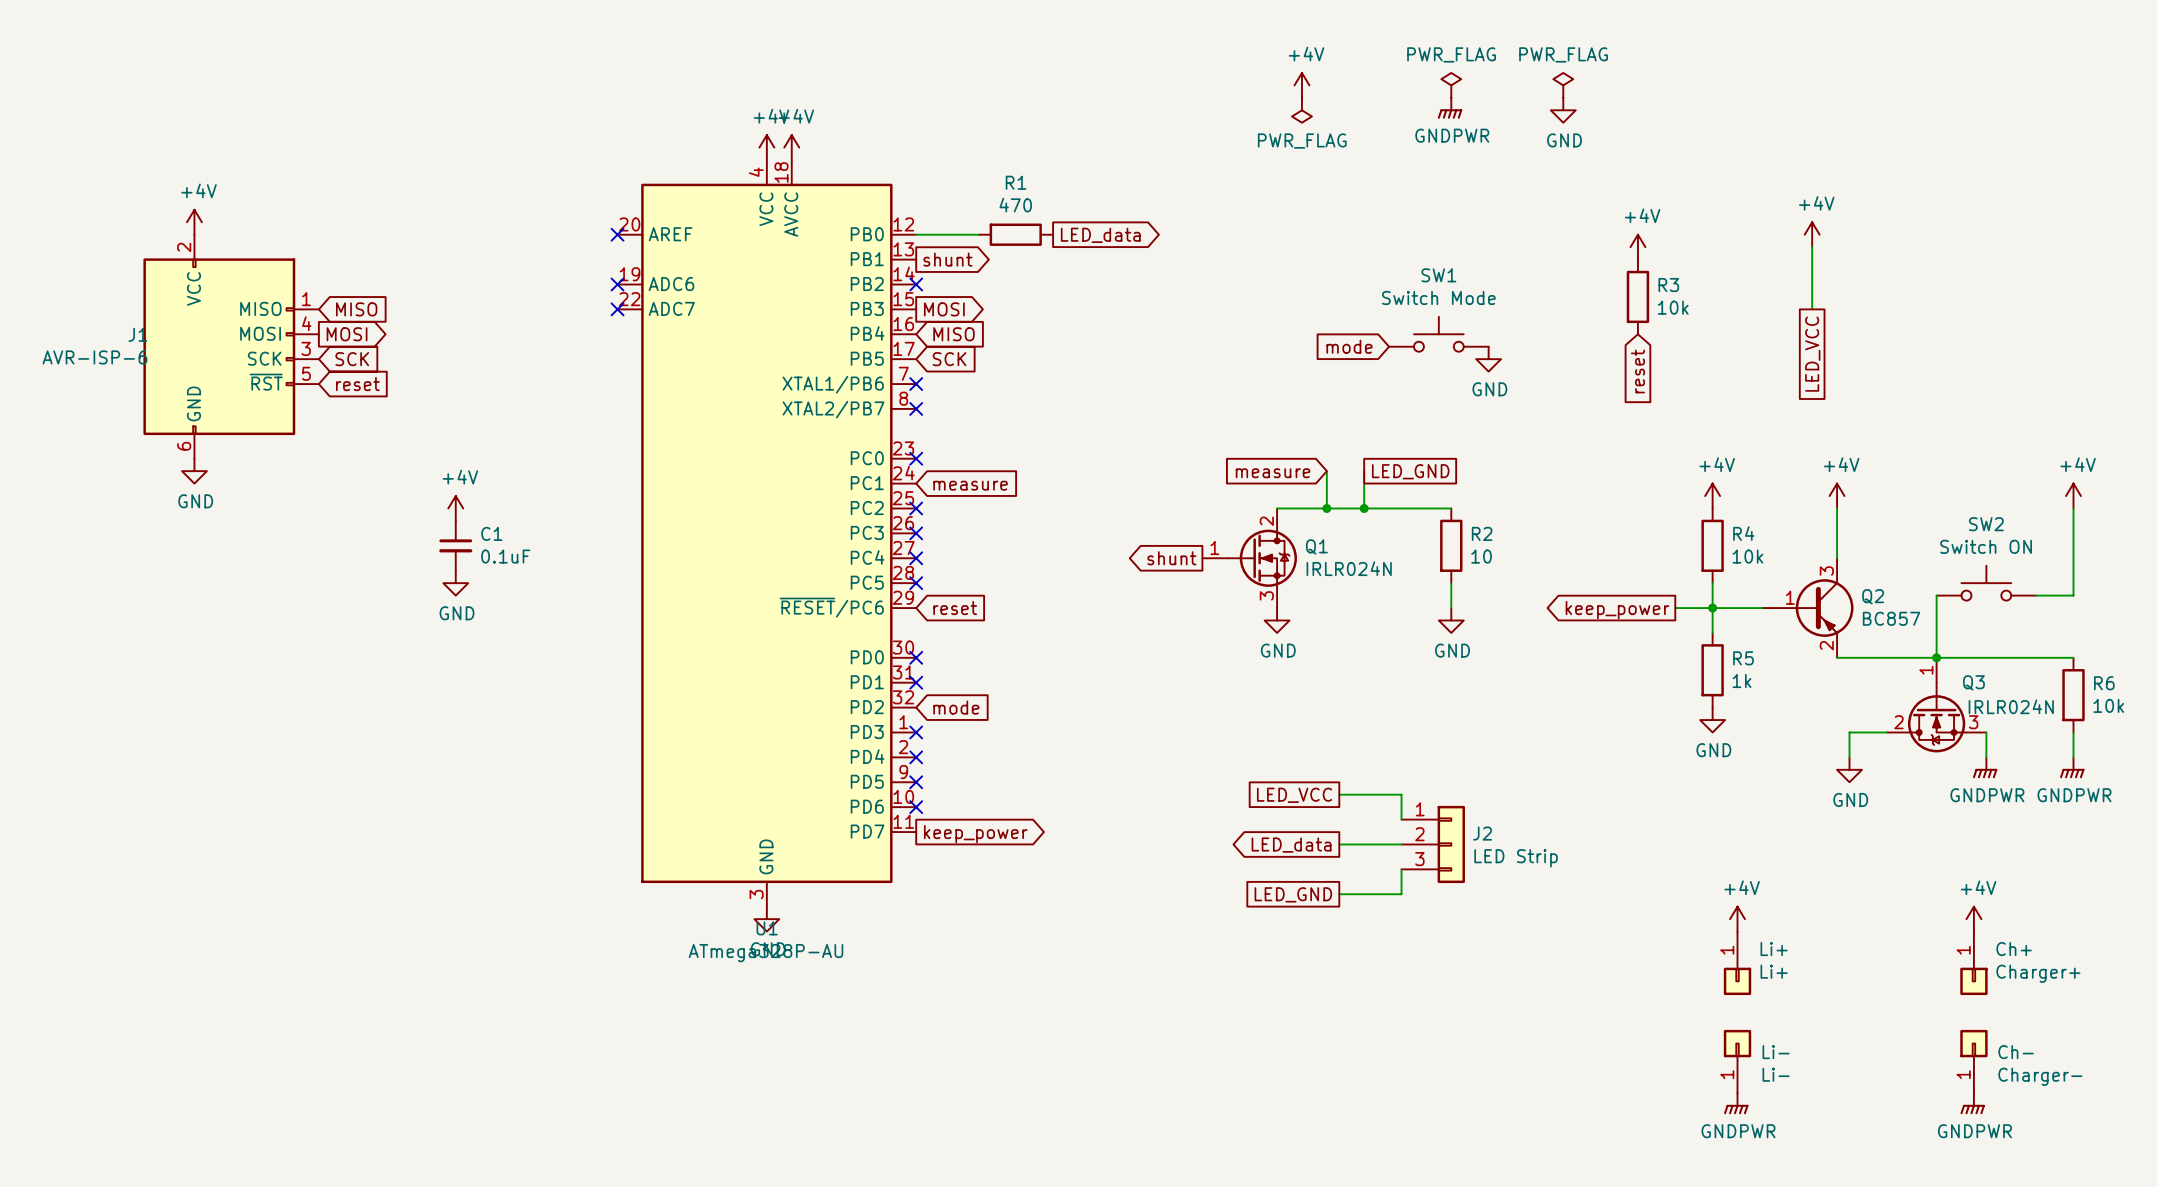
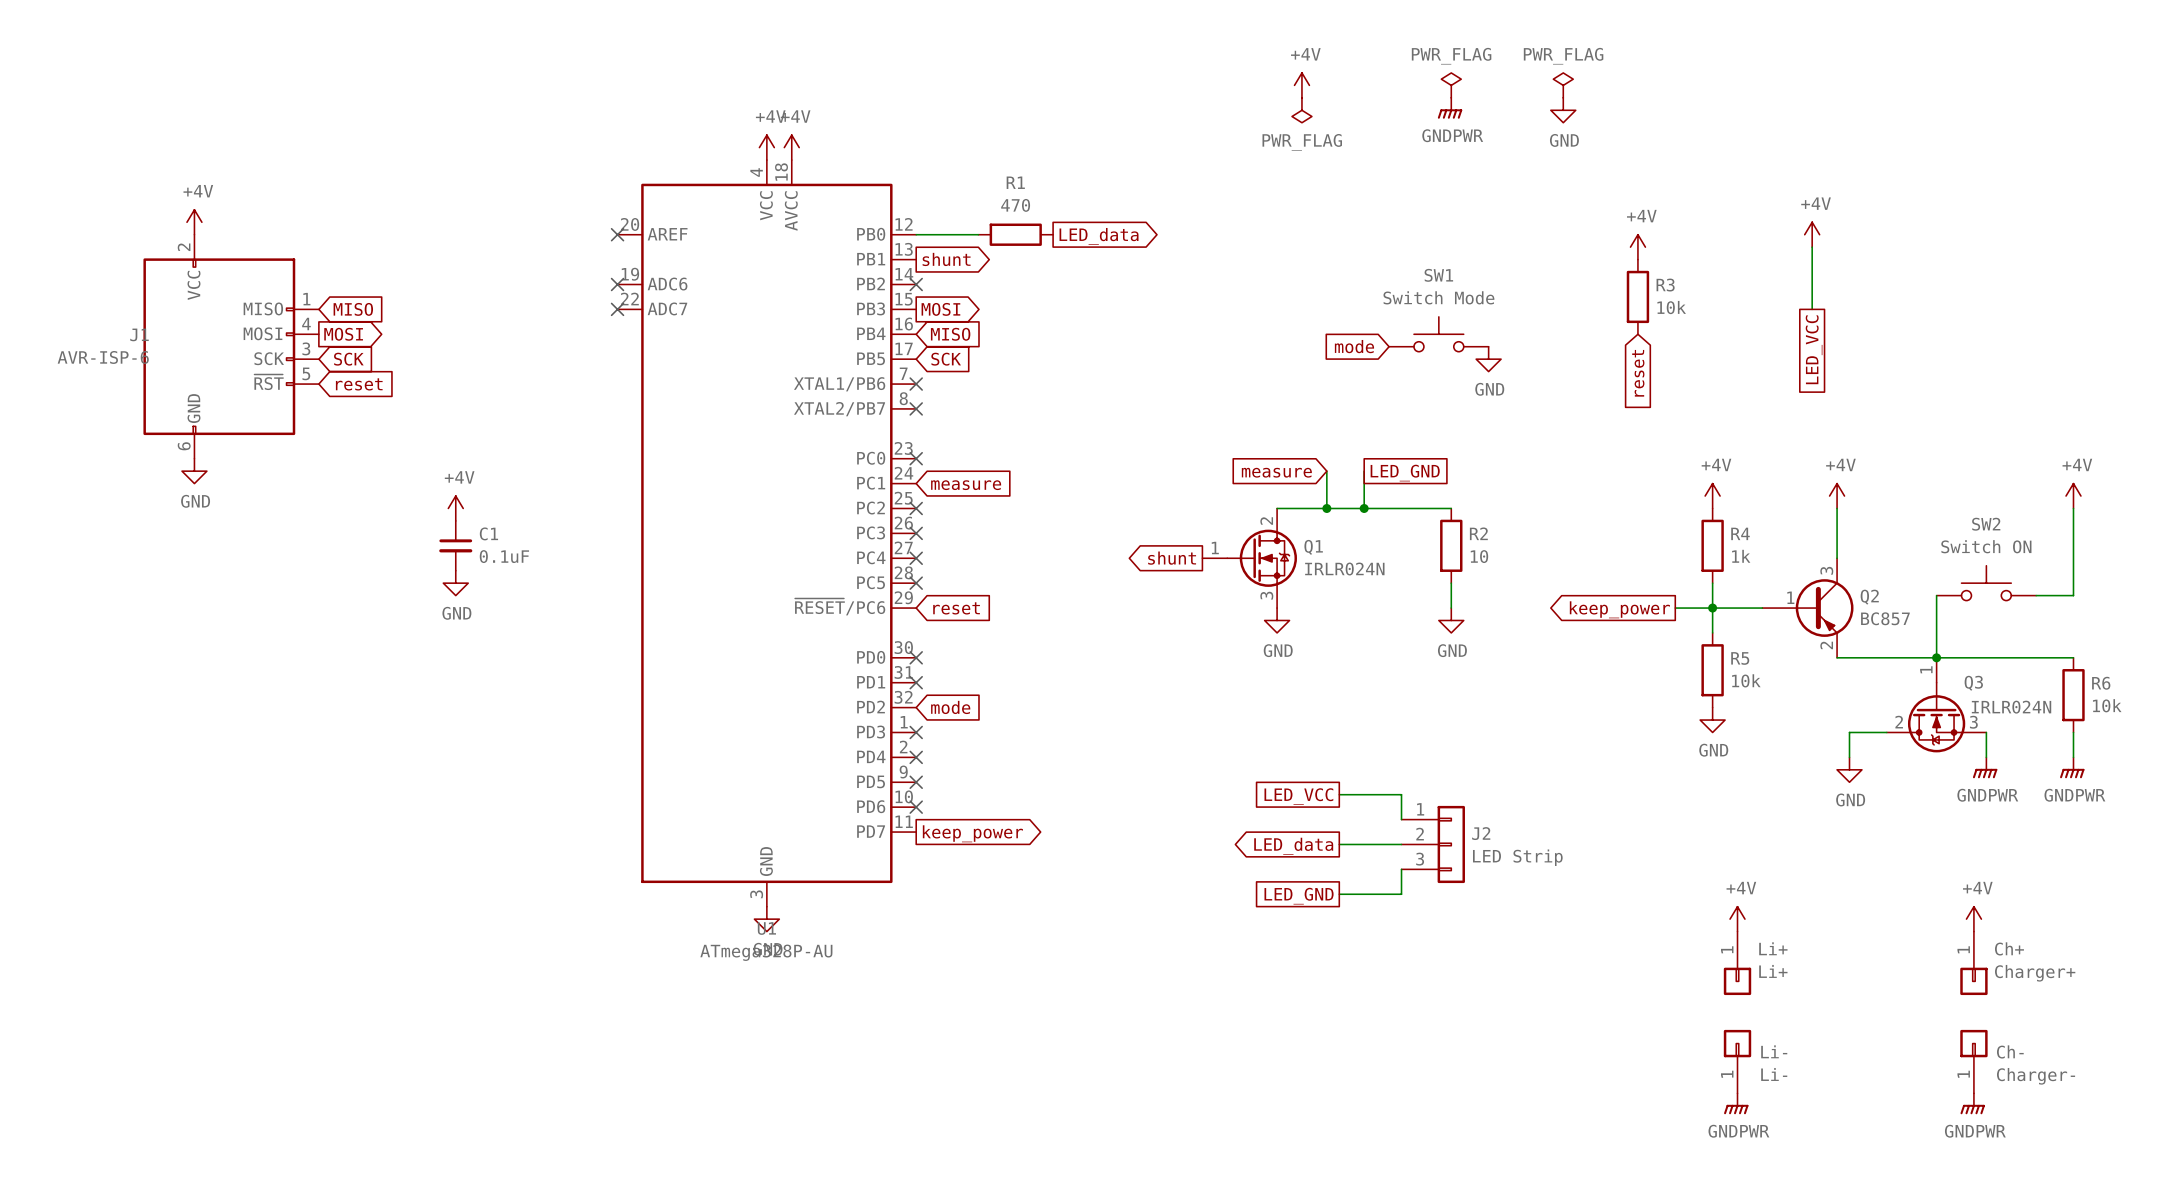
R4 value: 10k (1747, 556) -> 1k (1741, 556)
R5 value: 1k (1741, 681) -> 10k (1746, 680)

